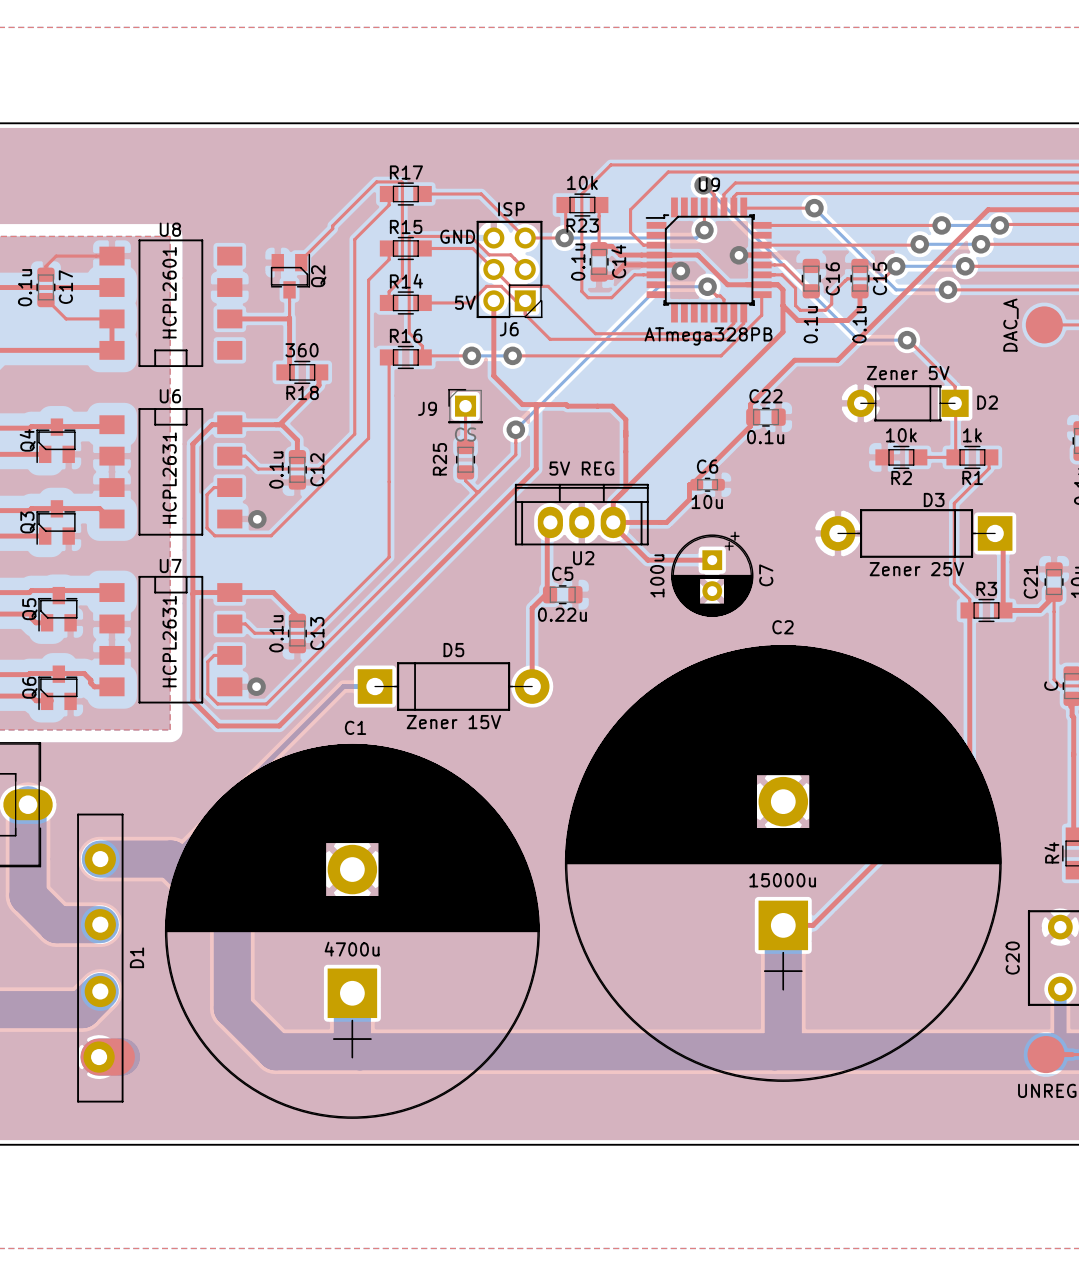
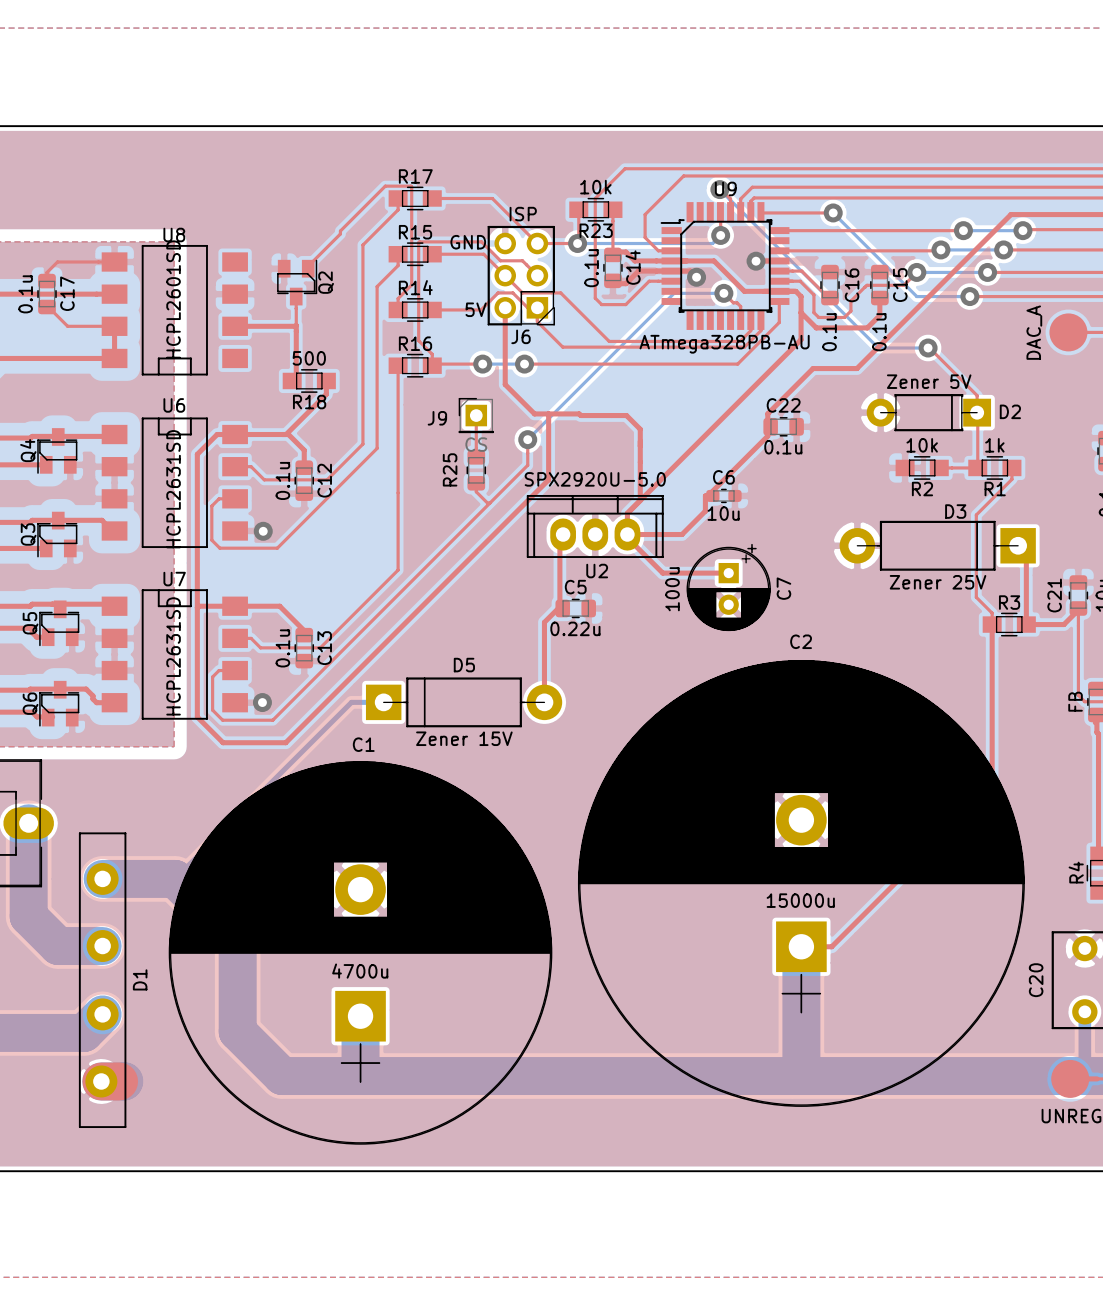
U8 value: HCPL2601 (169, 292) -> HCPL2601SD (173, 299)
U9 value: ATmega328PB (708, 336) -> ATmega328PB-AU (724, 344)
R18 value: 360 (302, 350) -> 500 (309, 358)
U2 value: 5V REG (581, 468) -> SPX2920U-5.0 (595, 479)
U6 value: HCPL2631 (169, 478) -> HCPL2631SD (173, 489)
U7 value: HCPL2631 (169, 641) -> HCPL2631SD (173, 656)
part value: C (1051, 686) -> FB (1075, 701)

